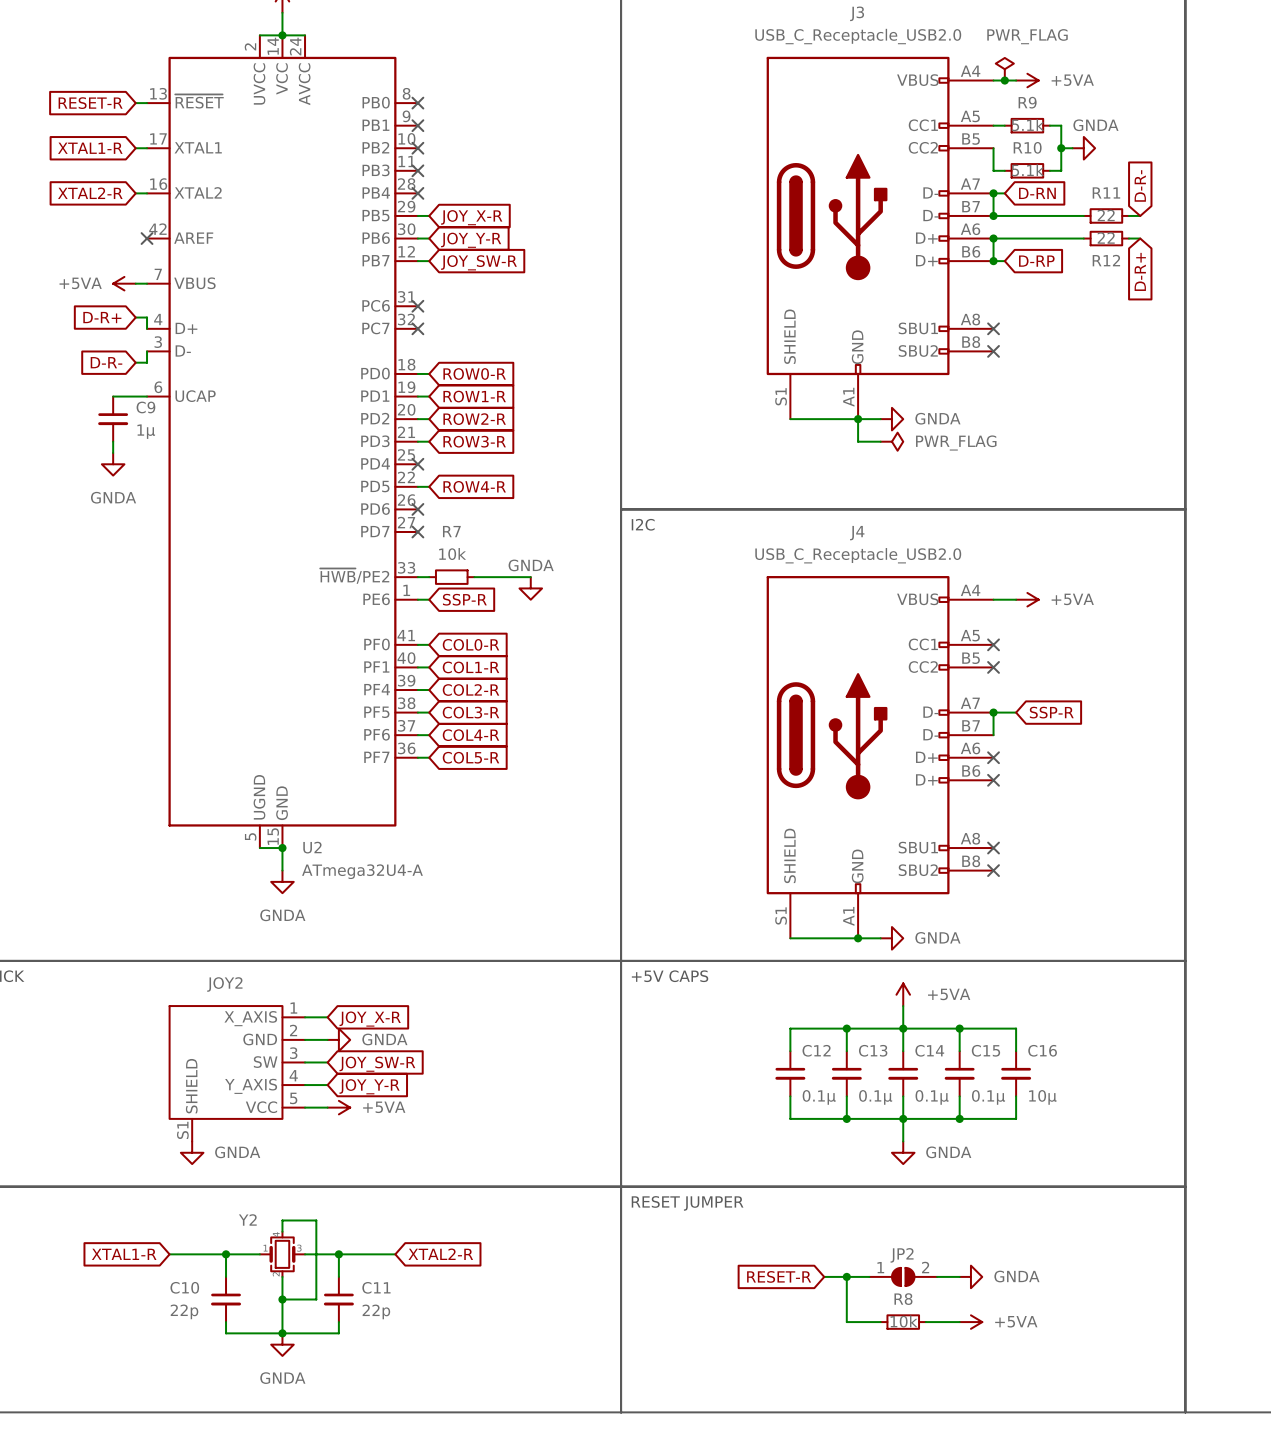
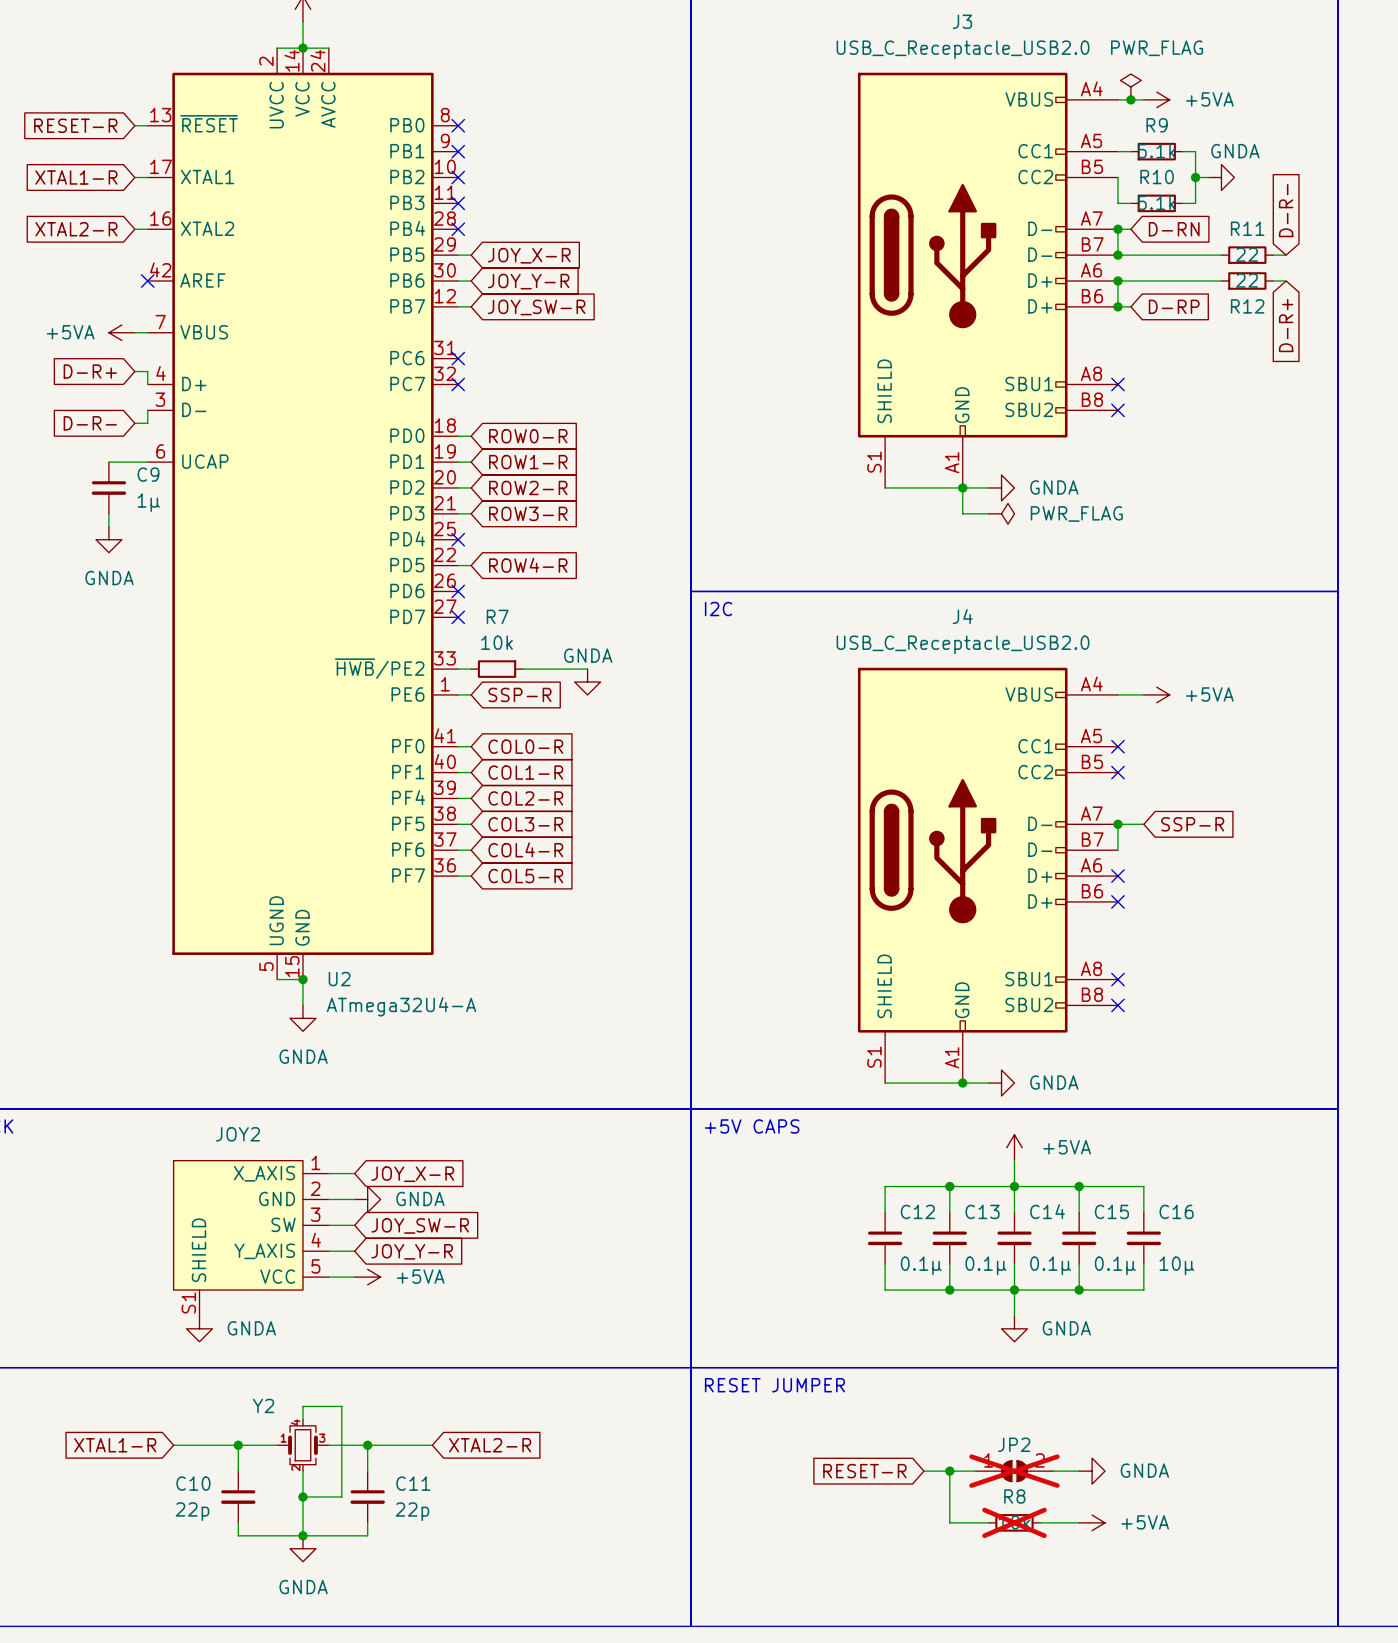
JP2 do-not-place cross: none -> (1014, 1471)
R8 do-not-place cross: none -> (1014, 1522)

